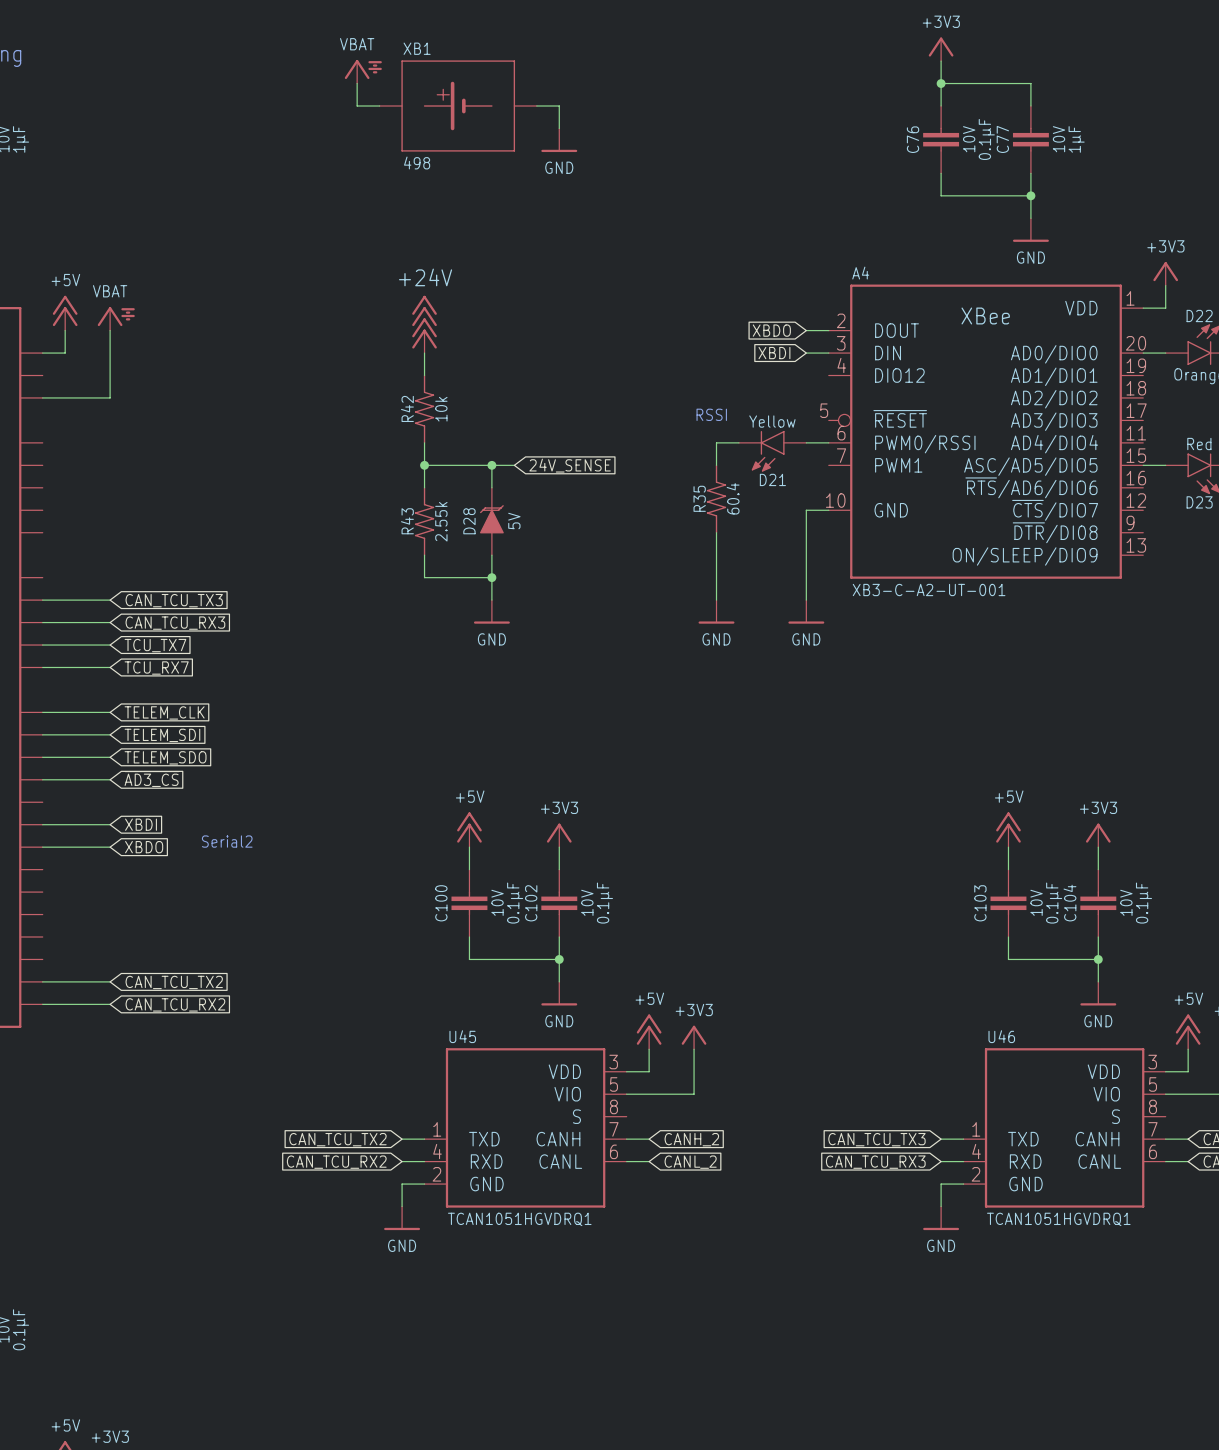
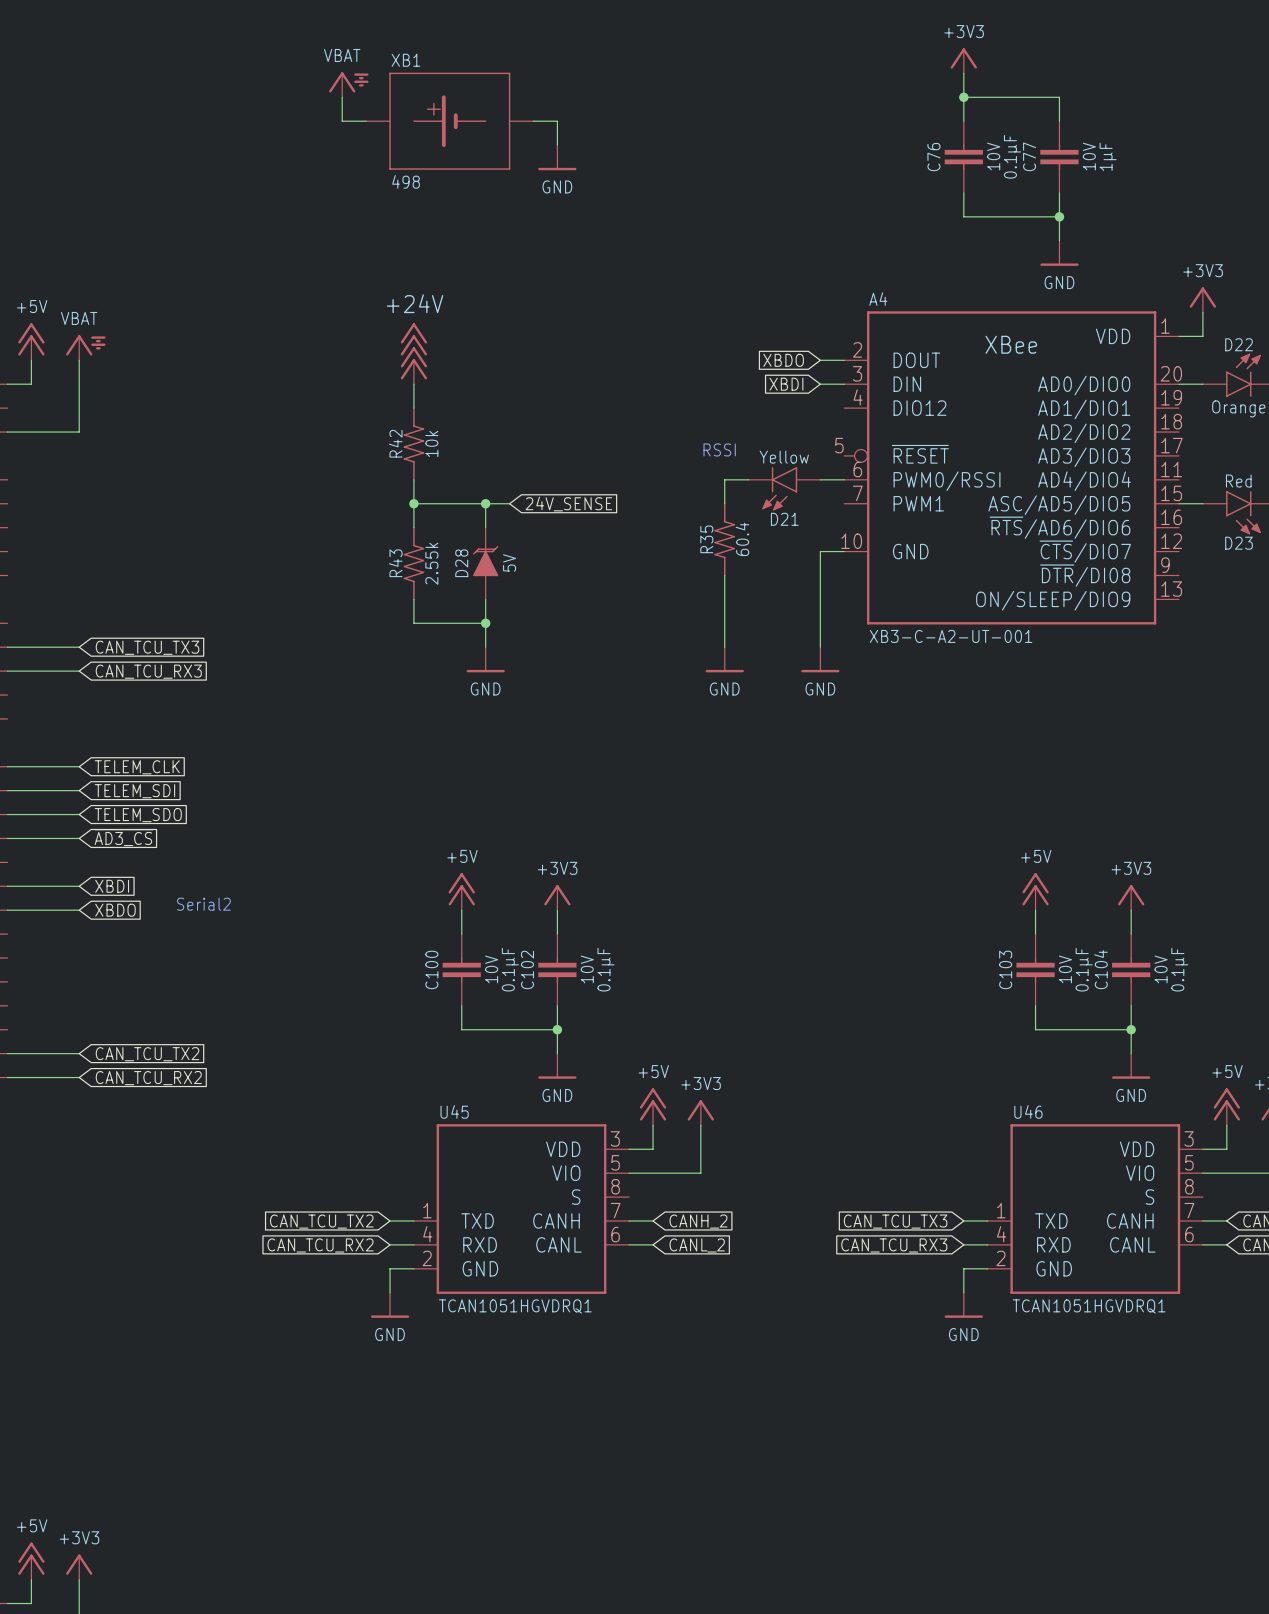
wire: (42, 645) (110, 645) -> none
global label: TCU_TX7 (155, 645) -> none
wire: (42, 667) (110, 667) -> none
global label: TCU_RX7 (156, 668) -> none

